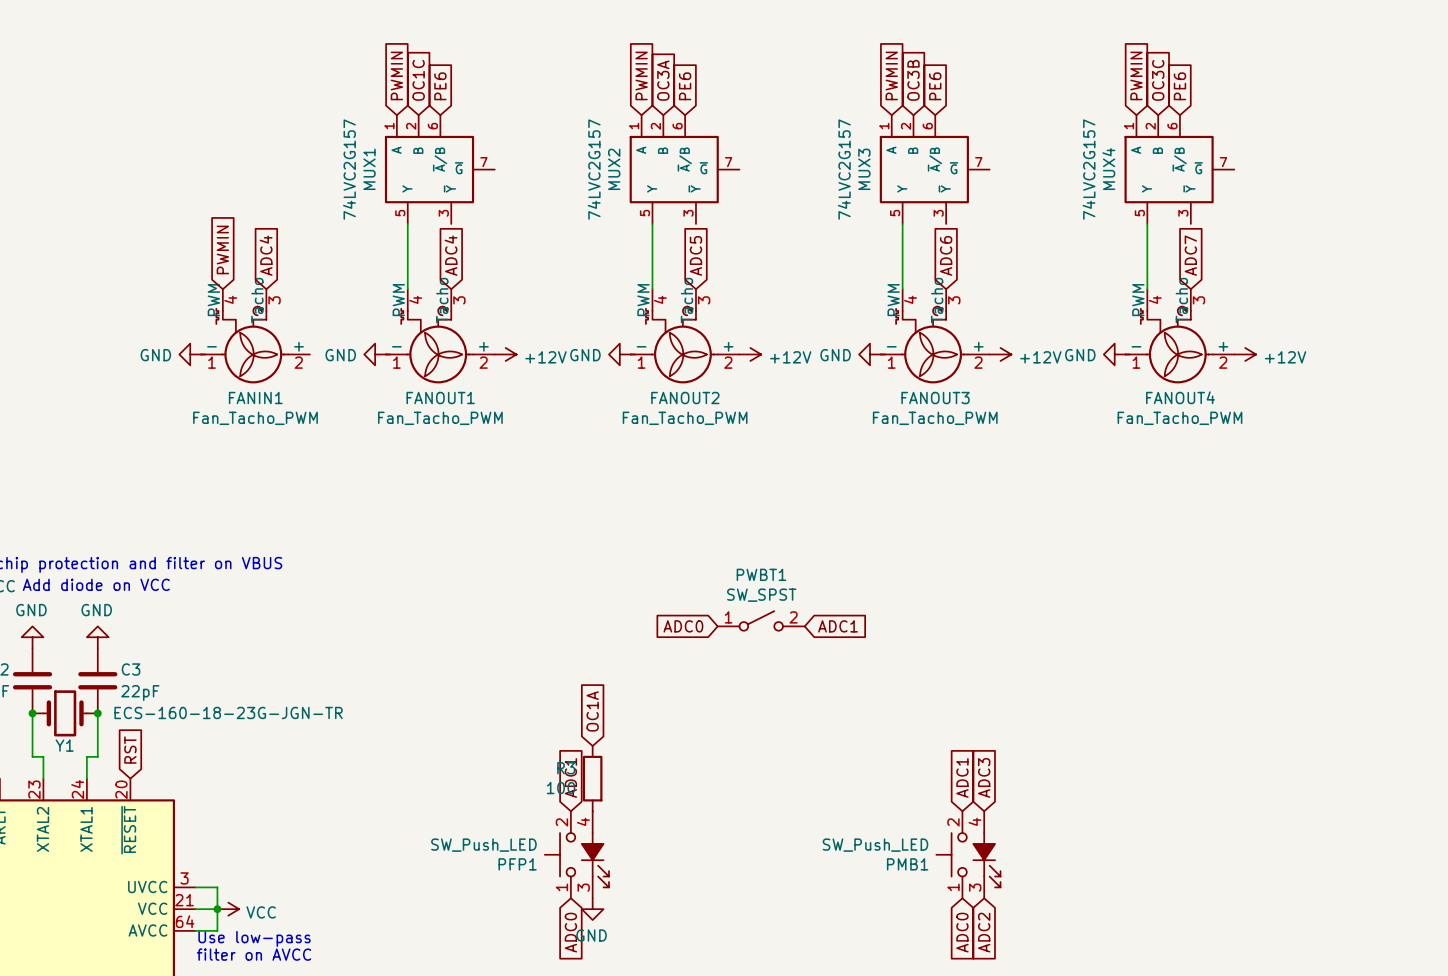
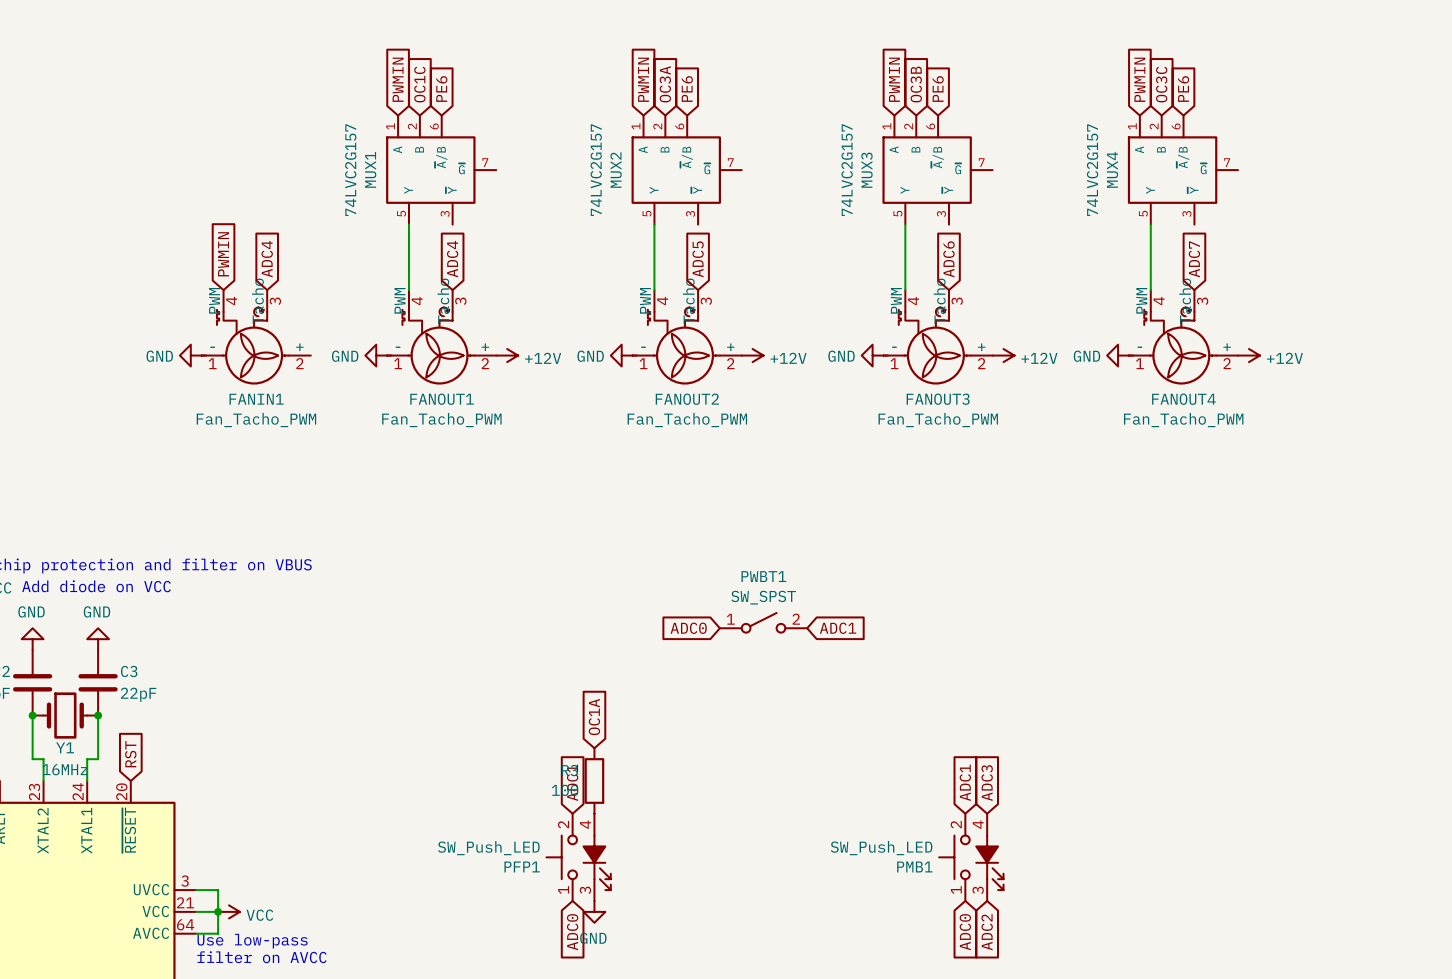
Y1 value: ECS-160-18-23G-JGN-TR (228, 712) -> 16MHz (65, 769)

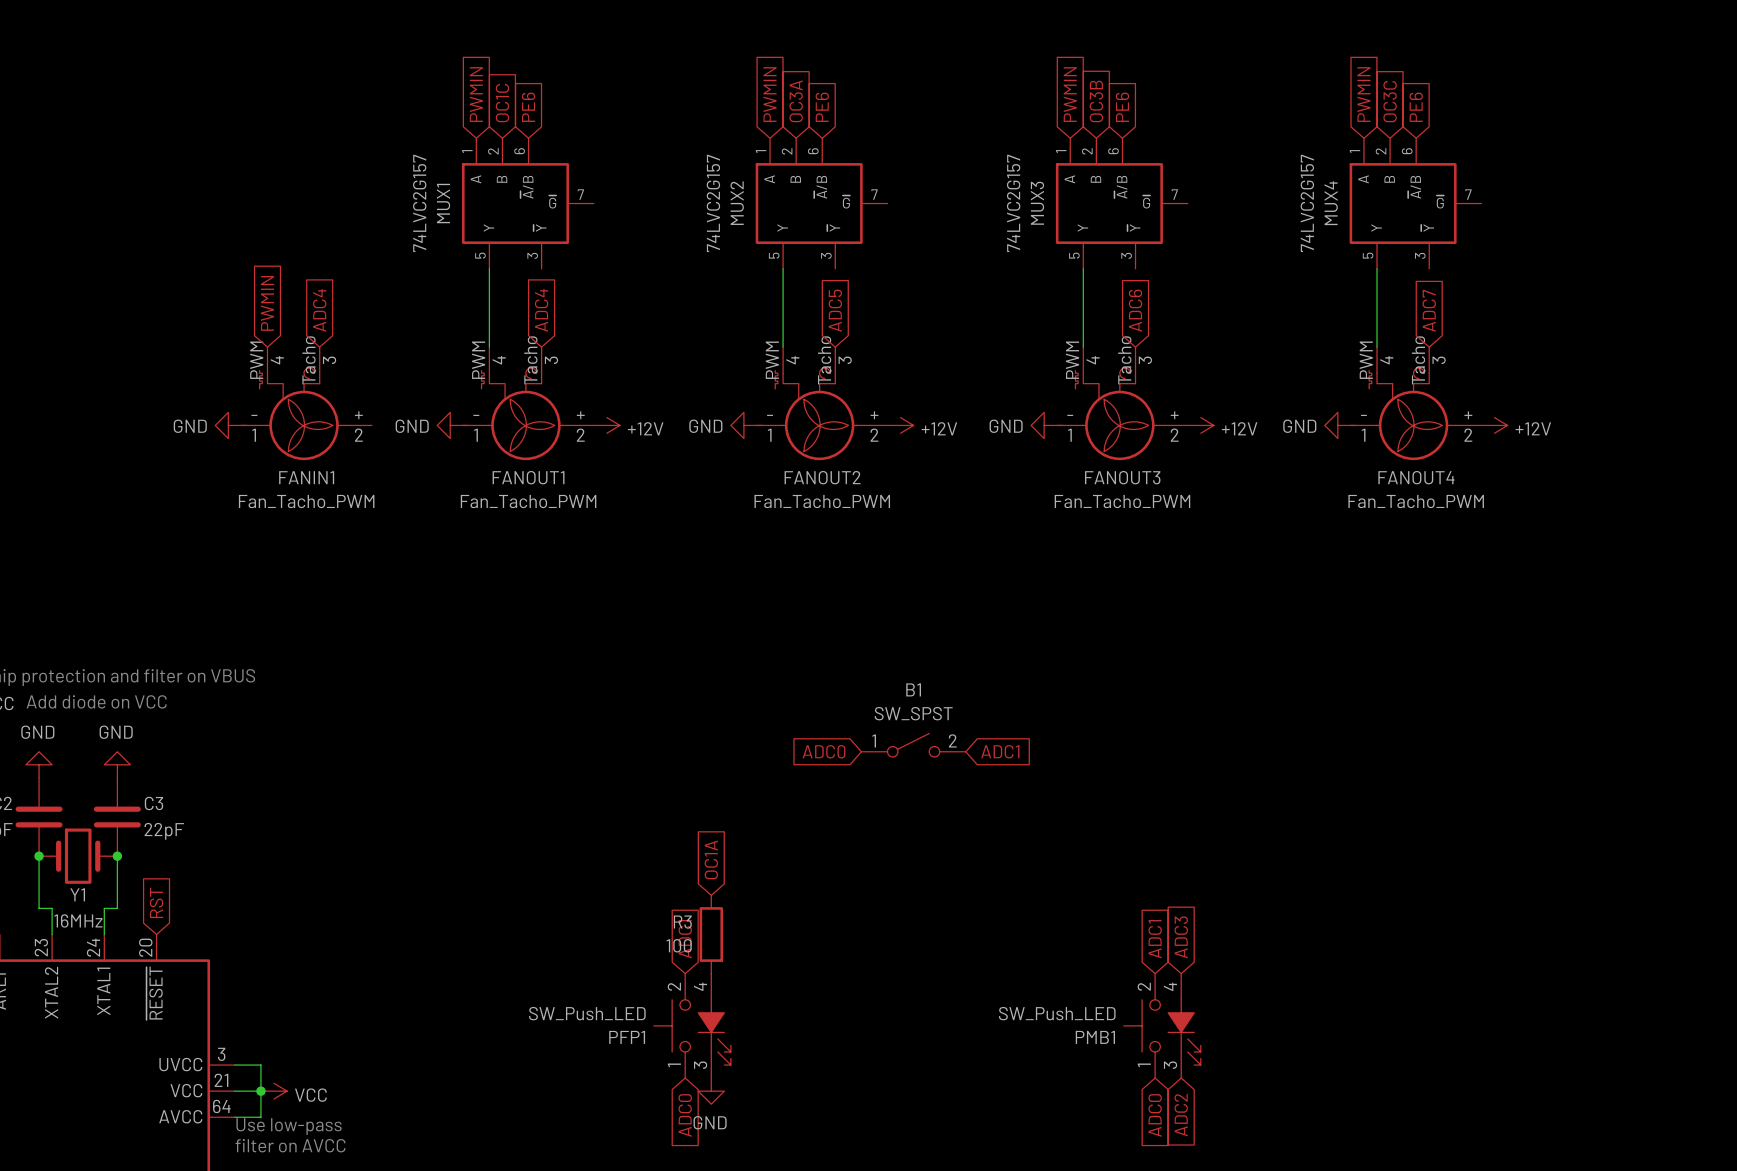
PWBT1 name: PWBT1 (763, 576) -> B1 (913, 689)

